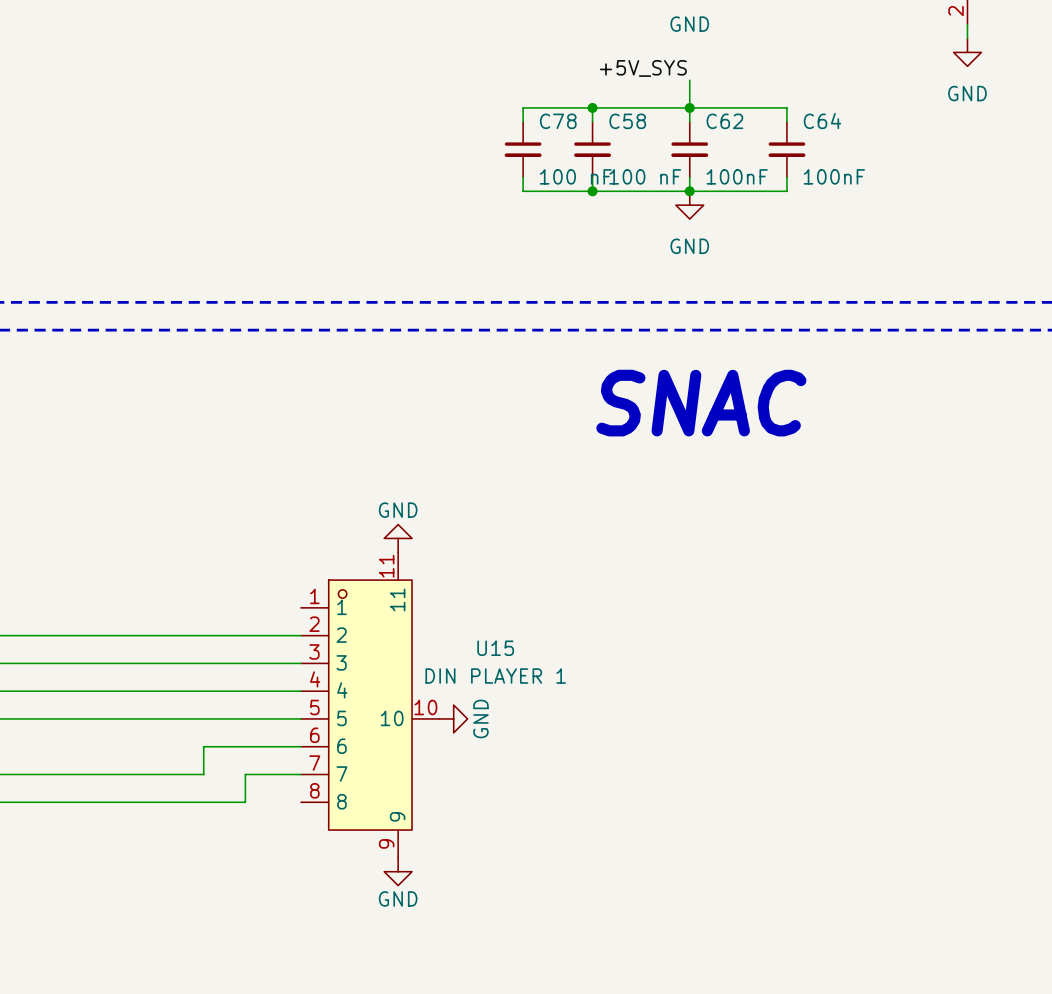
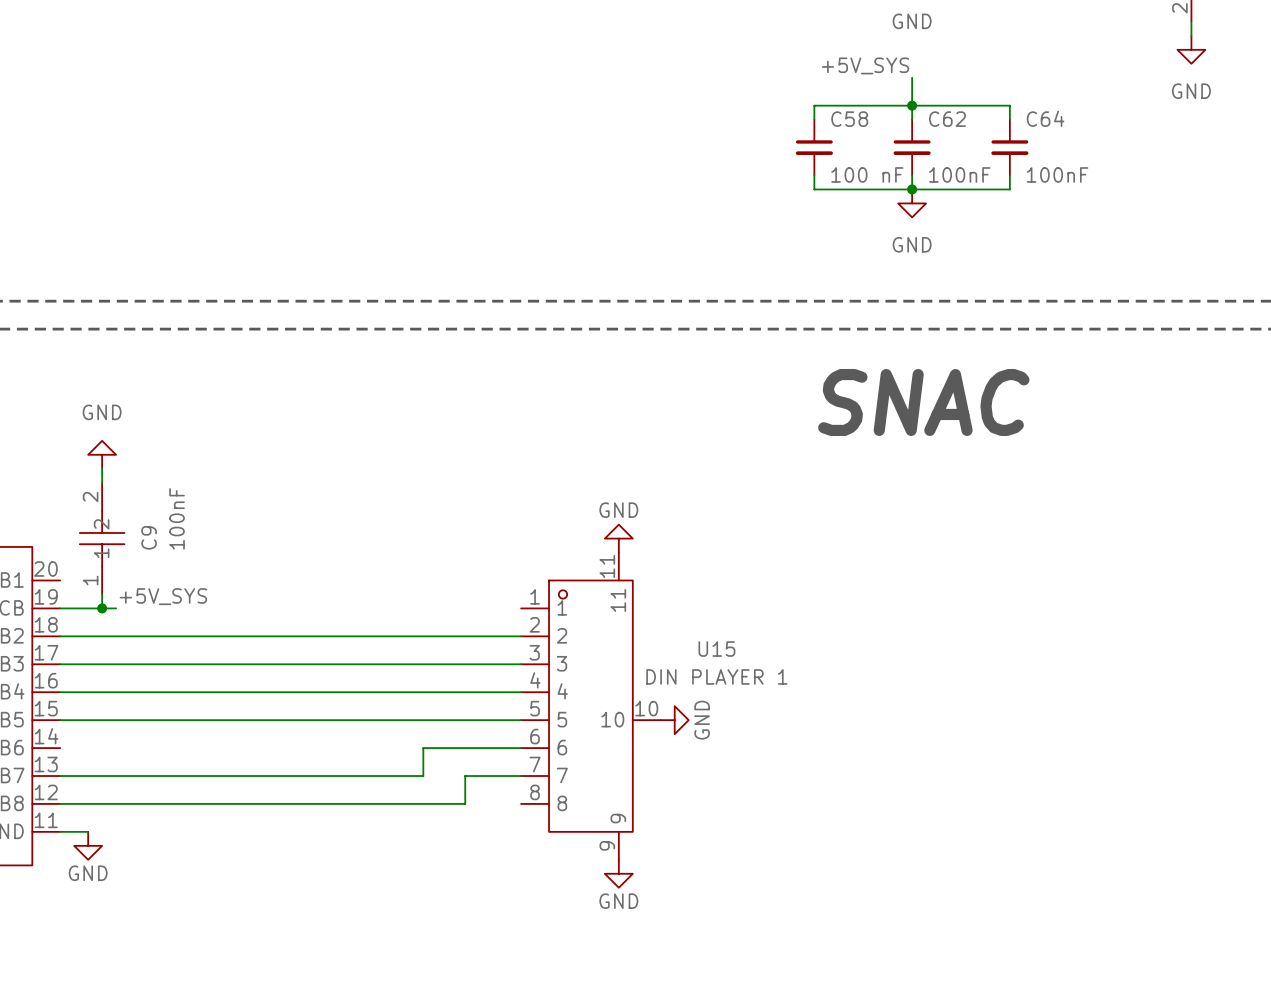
wire: (592, 107) (523, 107) (523, 121) -> none
junction: (592, 107) -> none
C78: 100 nF (523, 149) -> none
wire: (523, 177) (523, 191) (592, 191) -> none
junction: (592, 191) -> none

